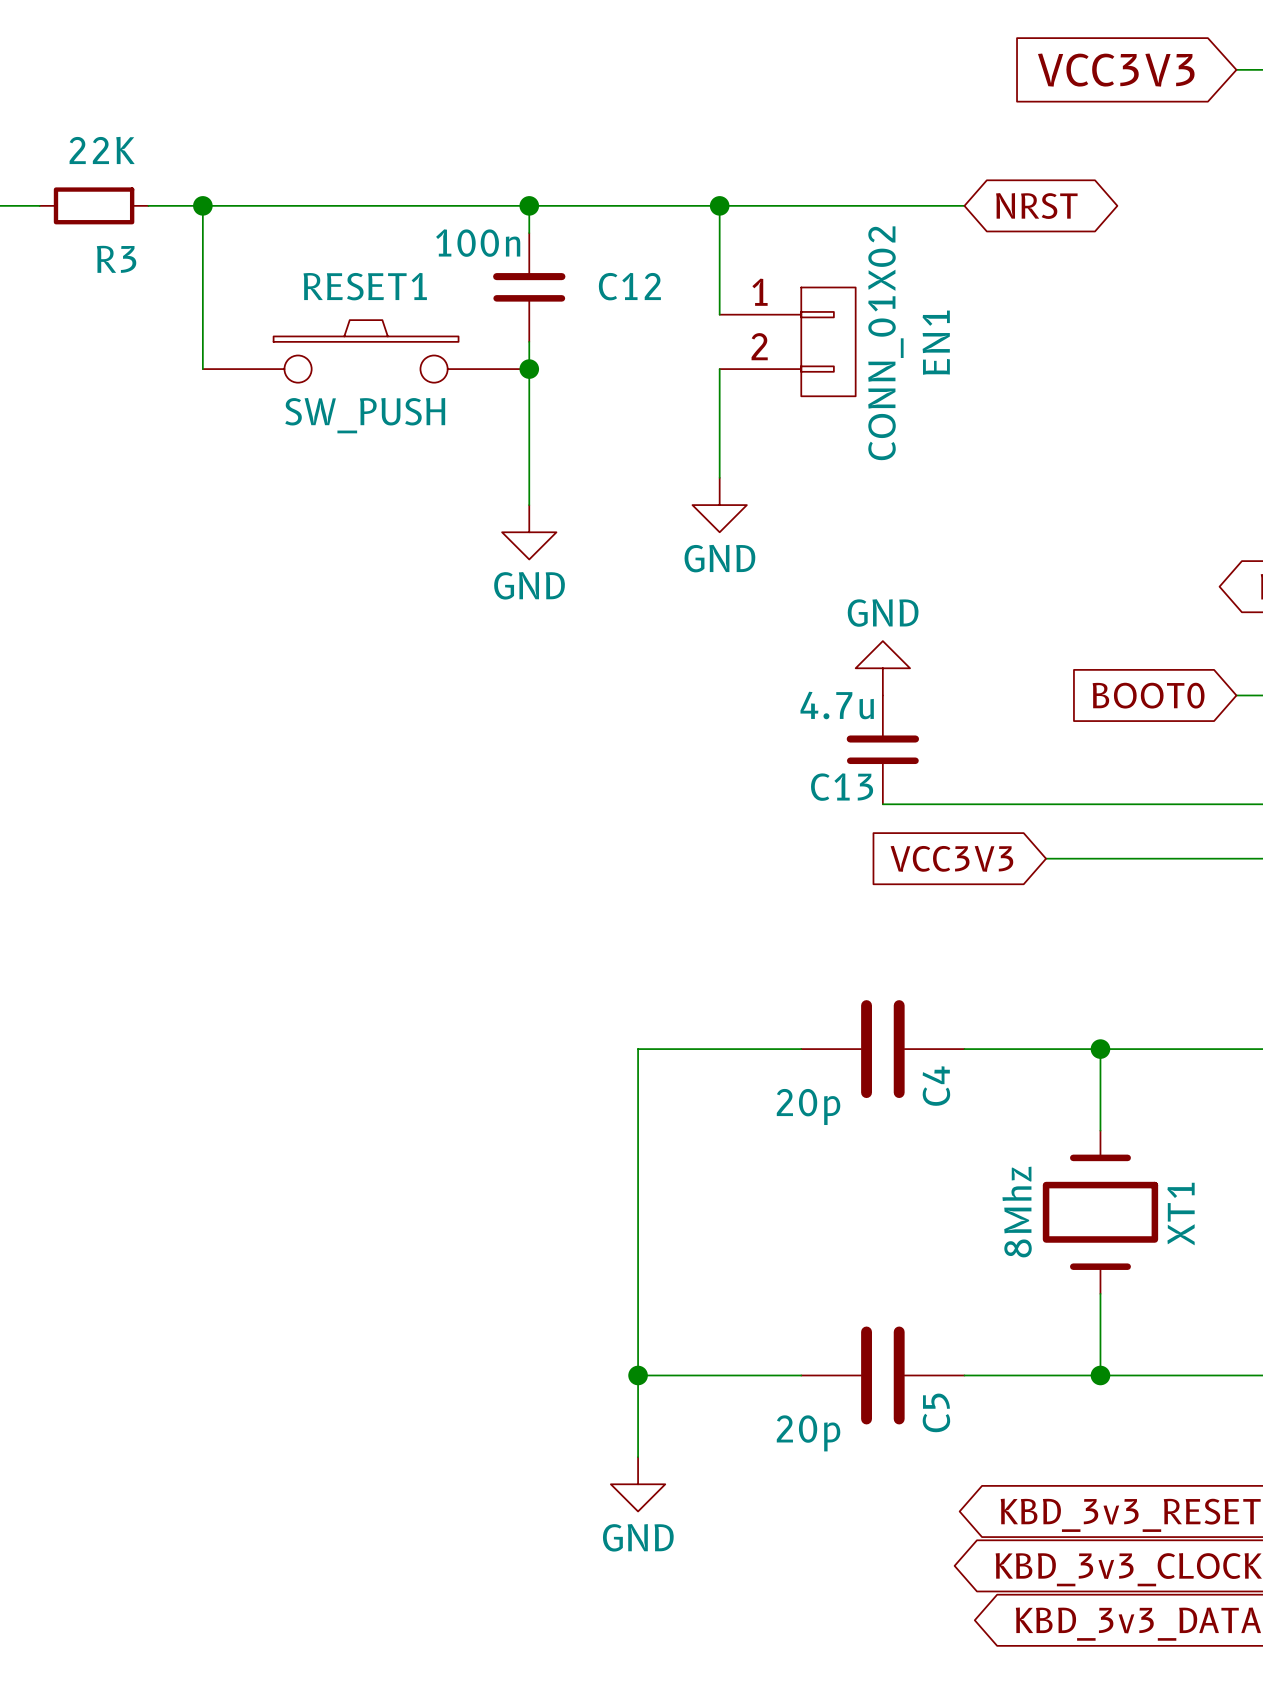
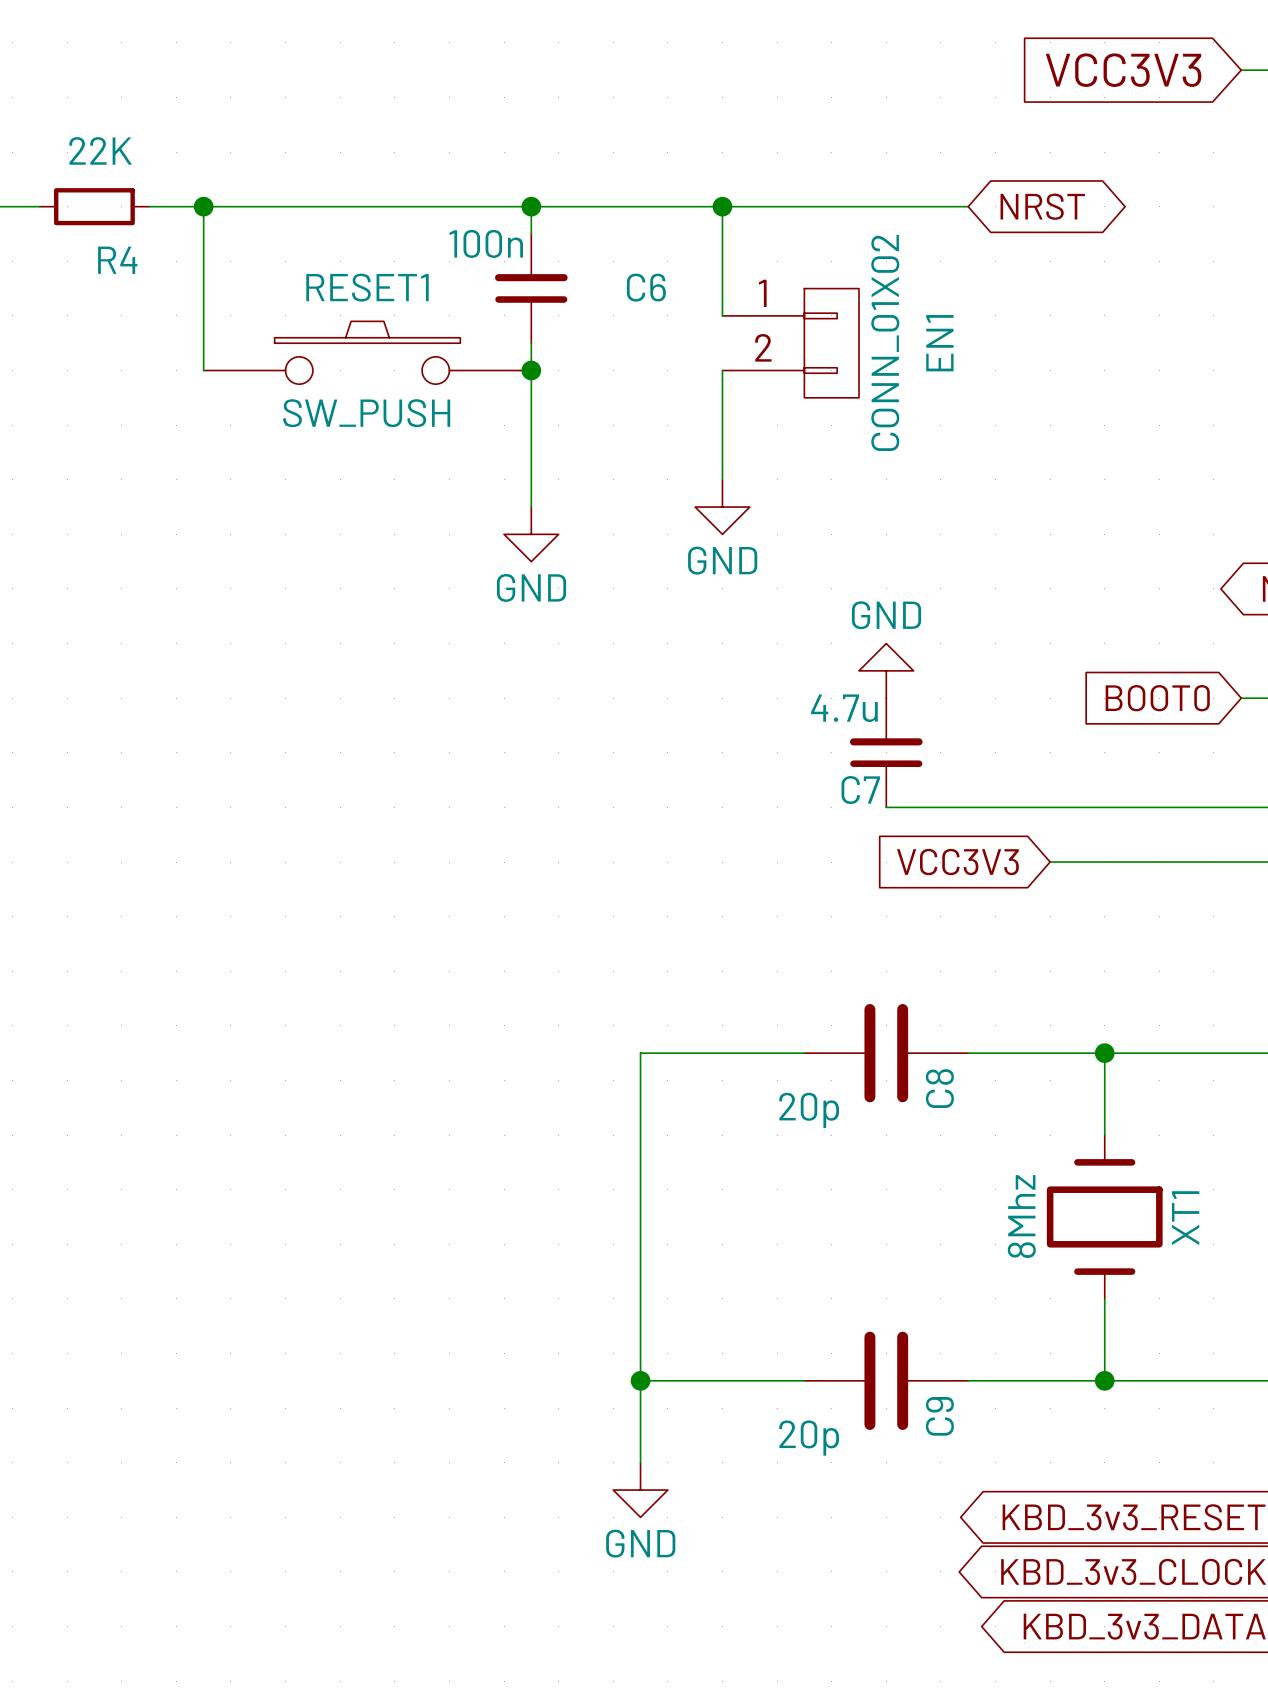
R3 name: R3 (116, 259) -> R4 (117, 260)
C12 name: C12 (629, 286) -> C6 (646, 287)
C13 name: C13 (842, 787) -> C7 (860, 790)
C4 name: C4 (936, 1086) -> C8 (939, 1088)
C5 name: C5 (936, 1412) -> C9 (939, 1416)

